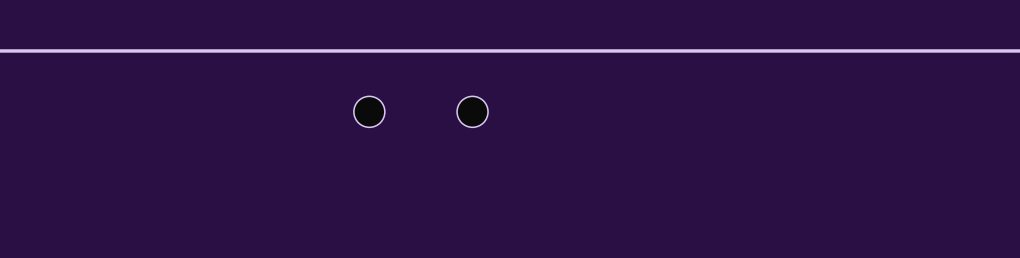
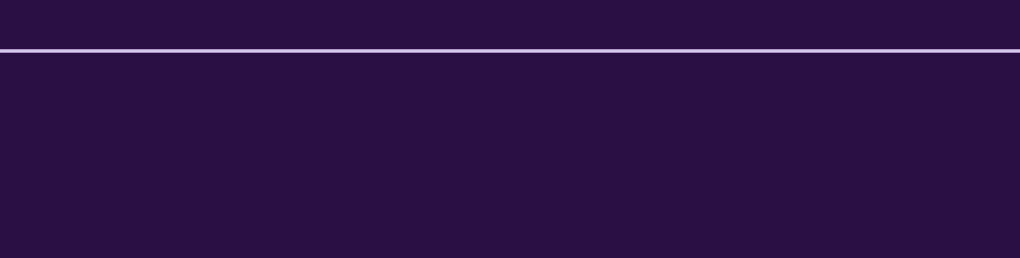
part: (420, 111) -> none

